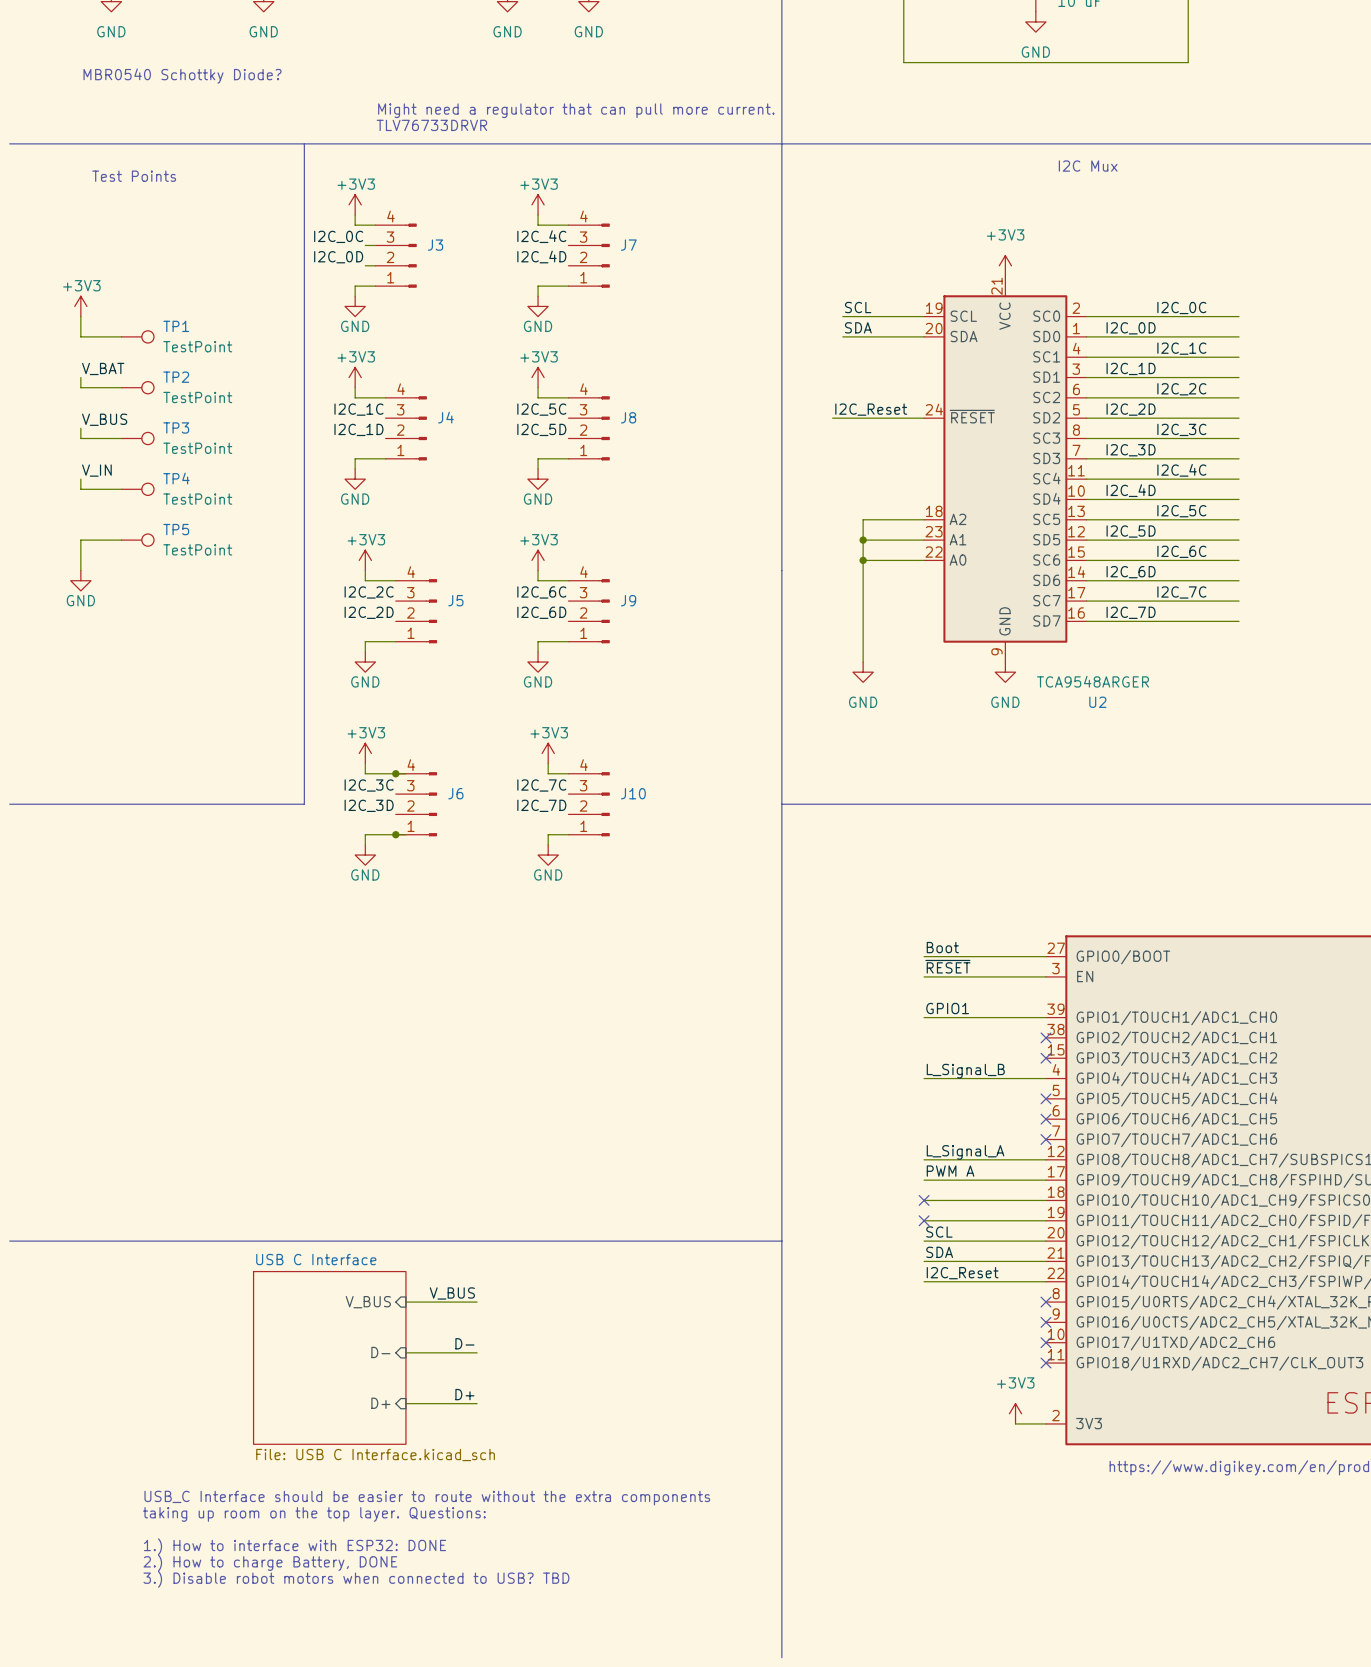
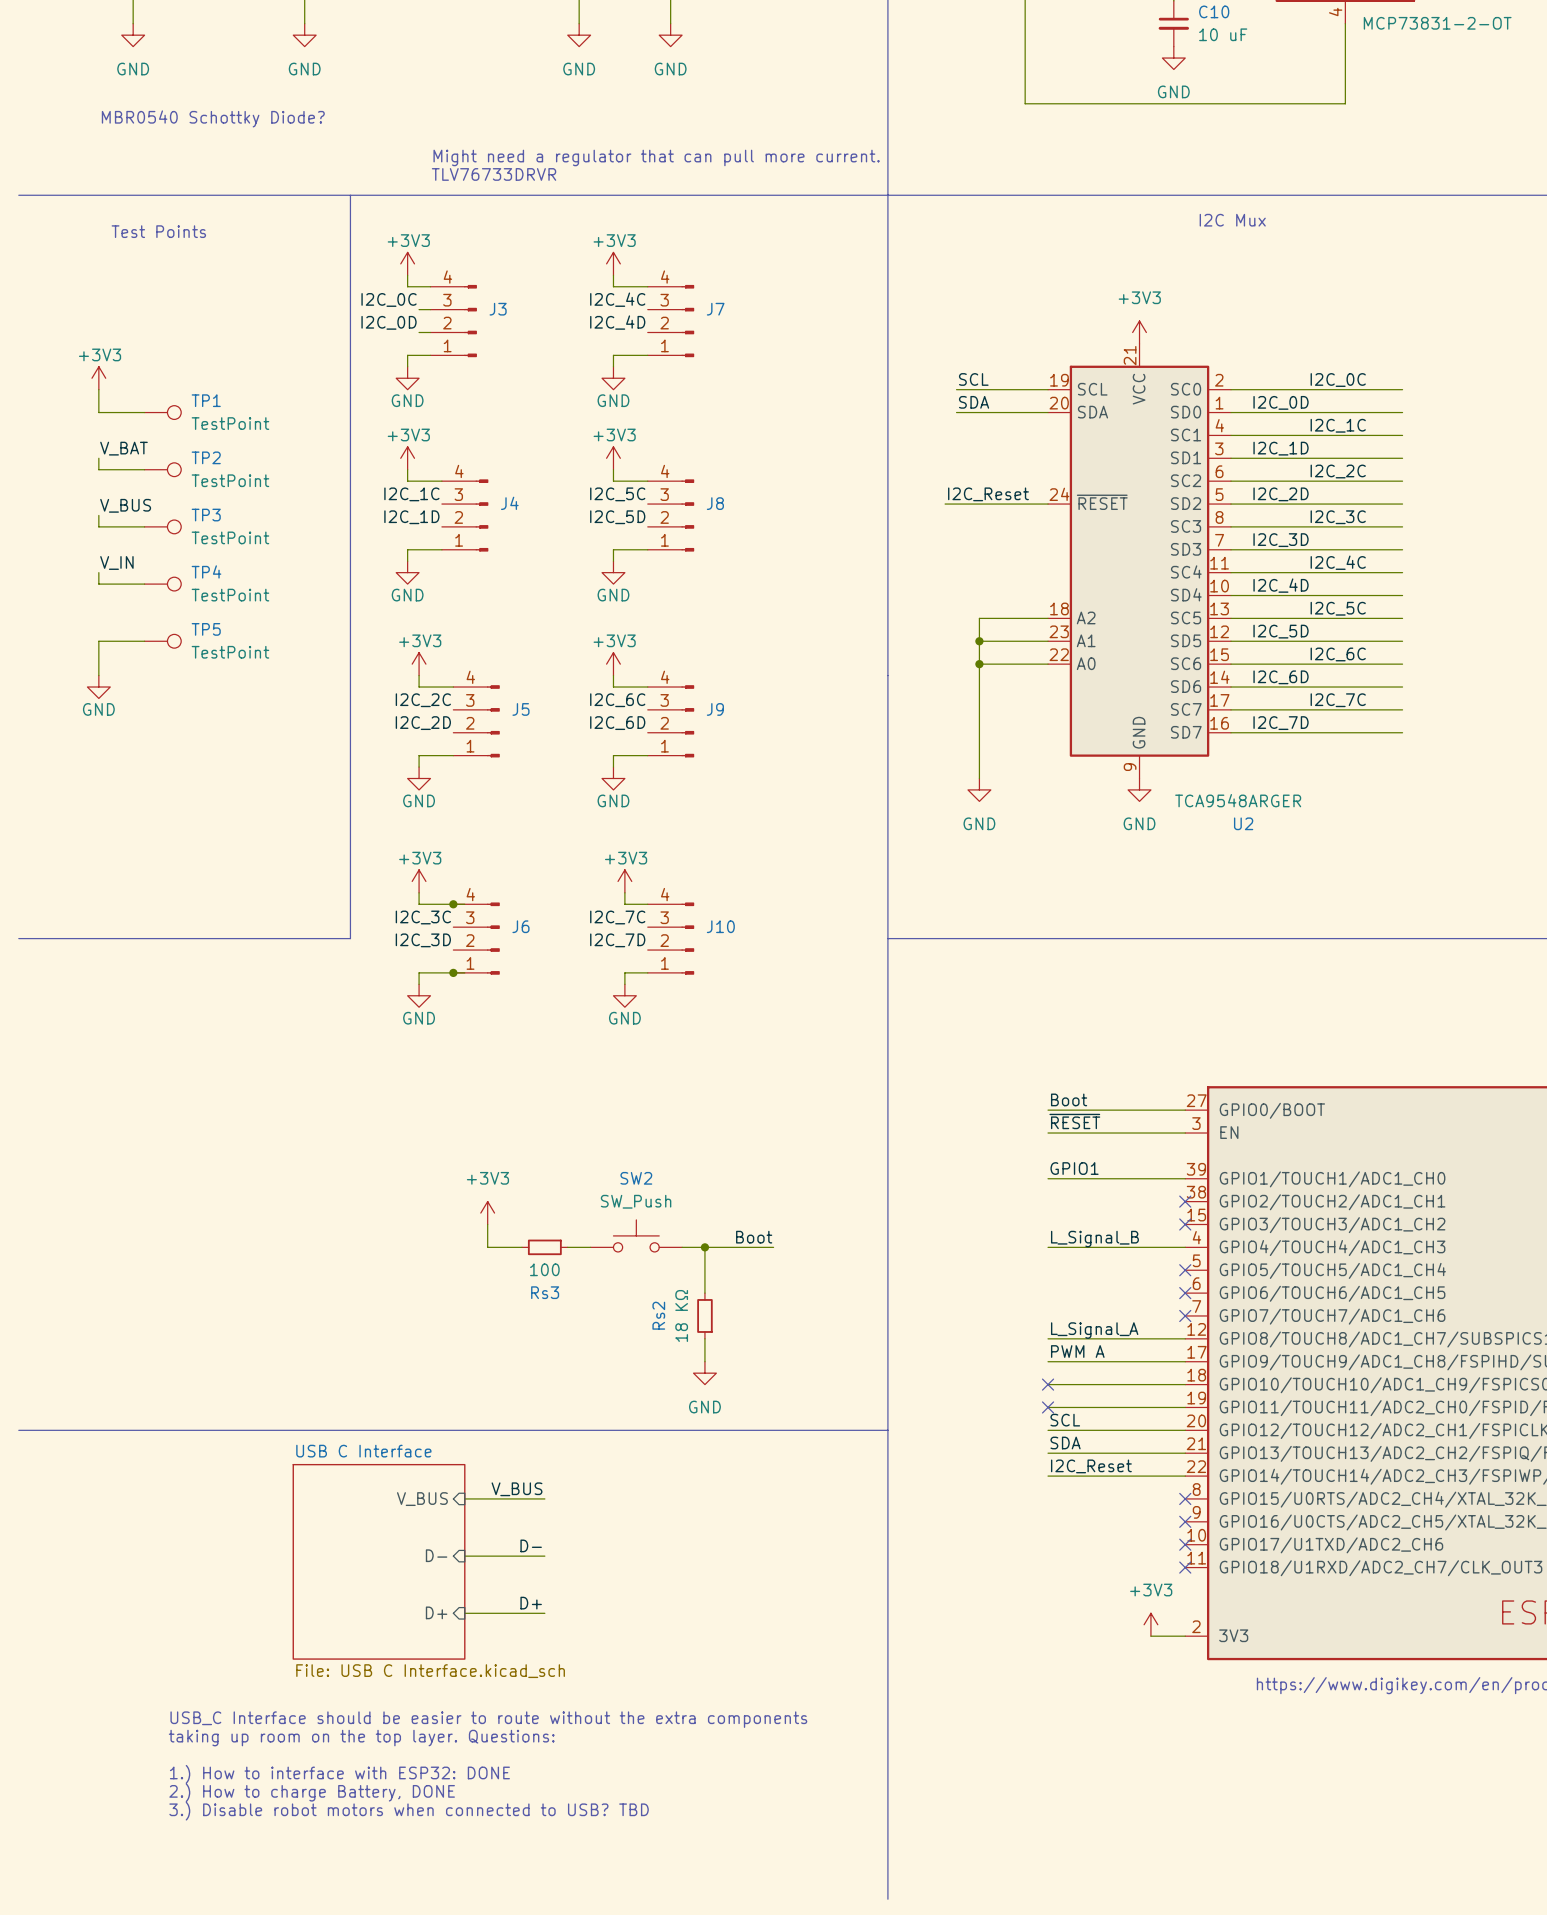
power symbol: none -> +3V3 (487, 1213)
wire: none -> (487, 1224) (487, 1247) (521, 1247)
SW2: none -> SW_Push (636, 1235)
label: none -> Boot (754, 1237)
Rs3: none -> 100 (544, 1247)
wire: none -> (567, 1247) (590, 1247)
wire: none -> (682, 1247) (773, 1247)
wire: none -> (704, 1247) (704, 1293)
junction: none -> (704, 1247)
Rs2: none -> 18 KΩ (704, 1315)
wire: none -> (704, 1338) (704, 1361)
power symbol: none -> GND (704, 1373)

